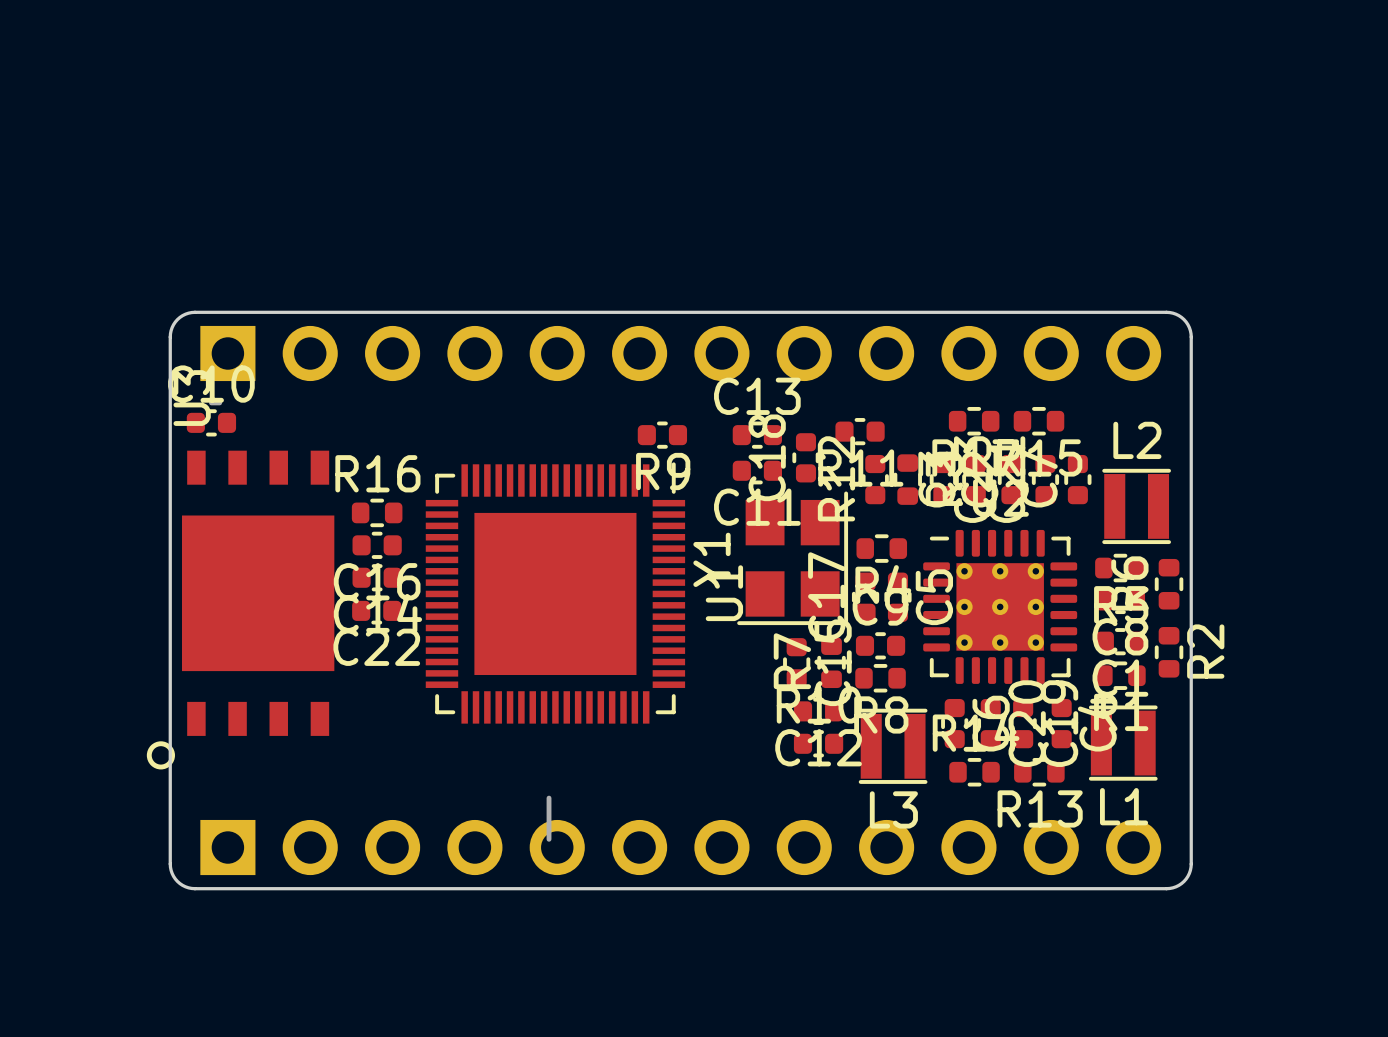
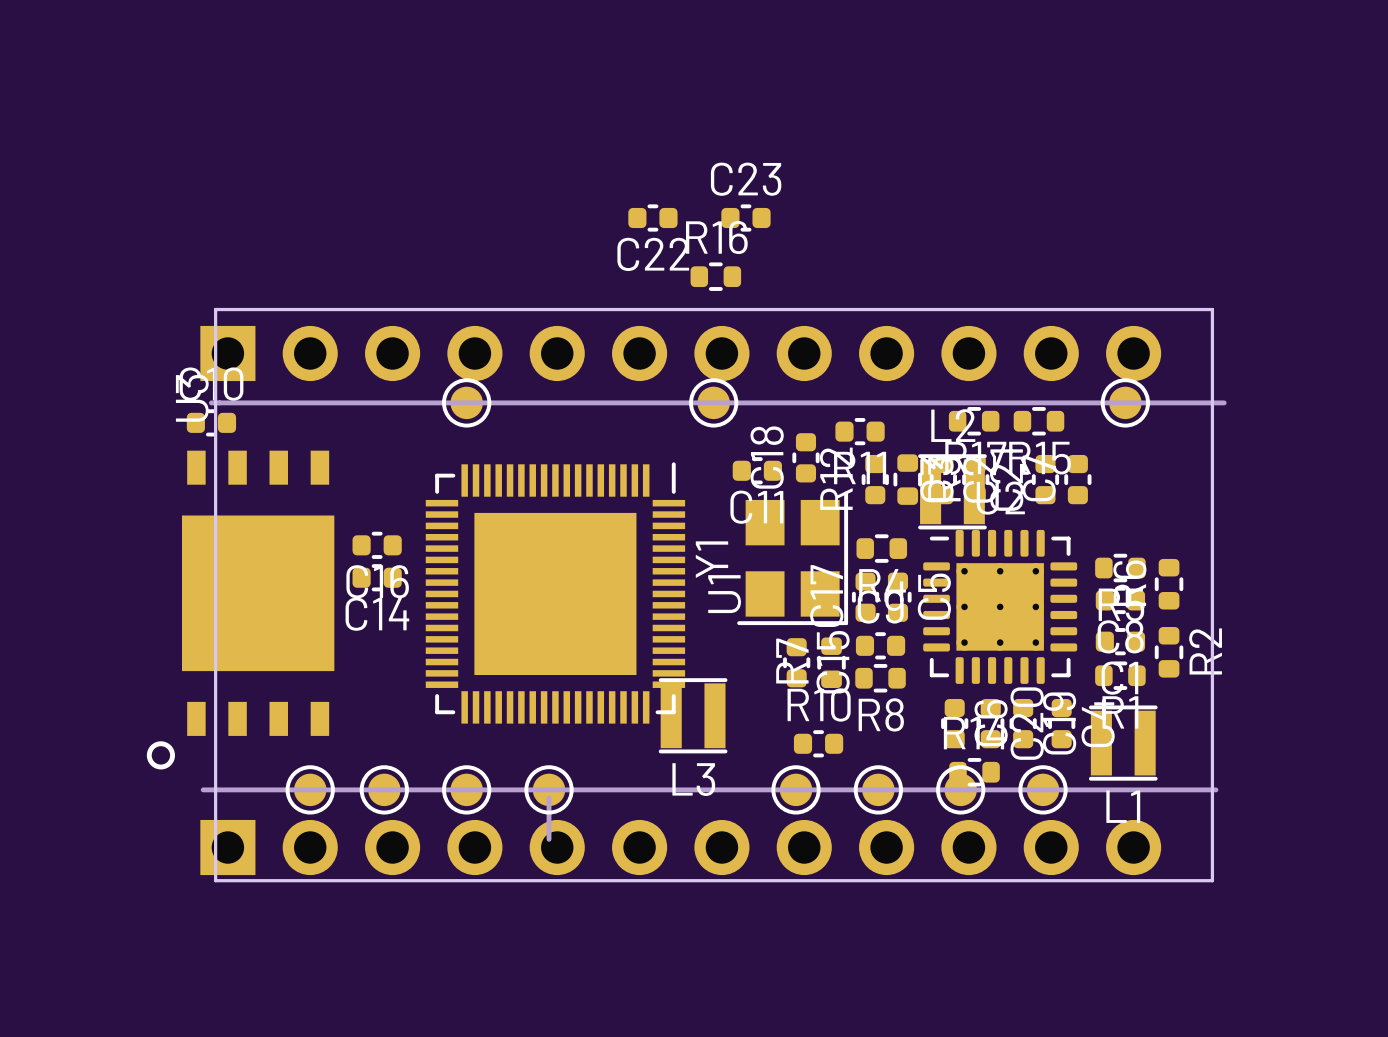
board edge: (194, 312) (1166, 312) (1178, 315) (1187, 324) (1191, 337) (1191, 863) (1187, 876) (1178, 885) (1166, 888) (194, 888) (182, 885) (173, 876) (170, 863) (170, 337) (172, 327) (177, 319) (185, 314) (194, 312) -> (215, 309) (215, 880) (1212, 880) (1212, 309) (215, 309)
line: none -> (219, 402) (1224, 402)
part: none -> (466, 402)
part: none -> (713, 402)
part: none -> (1125, 402)
R9: (662, 435) -> none
C13: (757, 435) -> none
C23 rotation: 0° (1011, 479) -> 90° clockwise (745, 217)
C23 position: (1011, 479) -> (745, 217)
L2 position: (1136, 506) -> (952, 491)
R16 position: (377, 512) -> (715, 276)
C22 position: (376, 610) -> (652, 217)
C12: (818, 711) -> none
L3 position: (893, 746) -> (693, 715)
R13: (1039, 772) -> none
line: none -> (203, 789) (1215, 789)
part: none -> (310, 789)
part: none -> (384, 789)
part: none -> (466, 789)
part: none -> (549, 789)
part: none -> (796, 789)
part: none -> (878, 789)
part: none -> (960, 789)
part: none -> (1043, 789)

